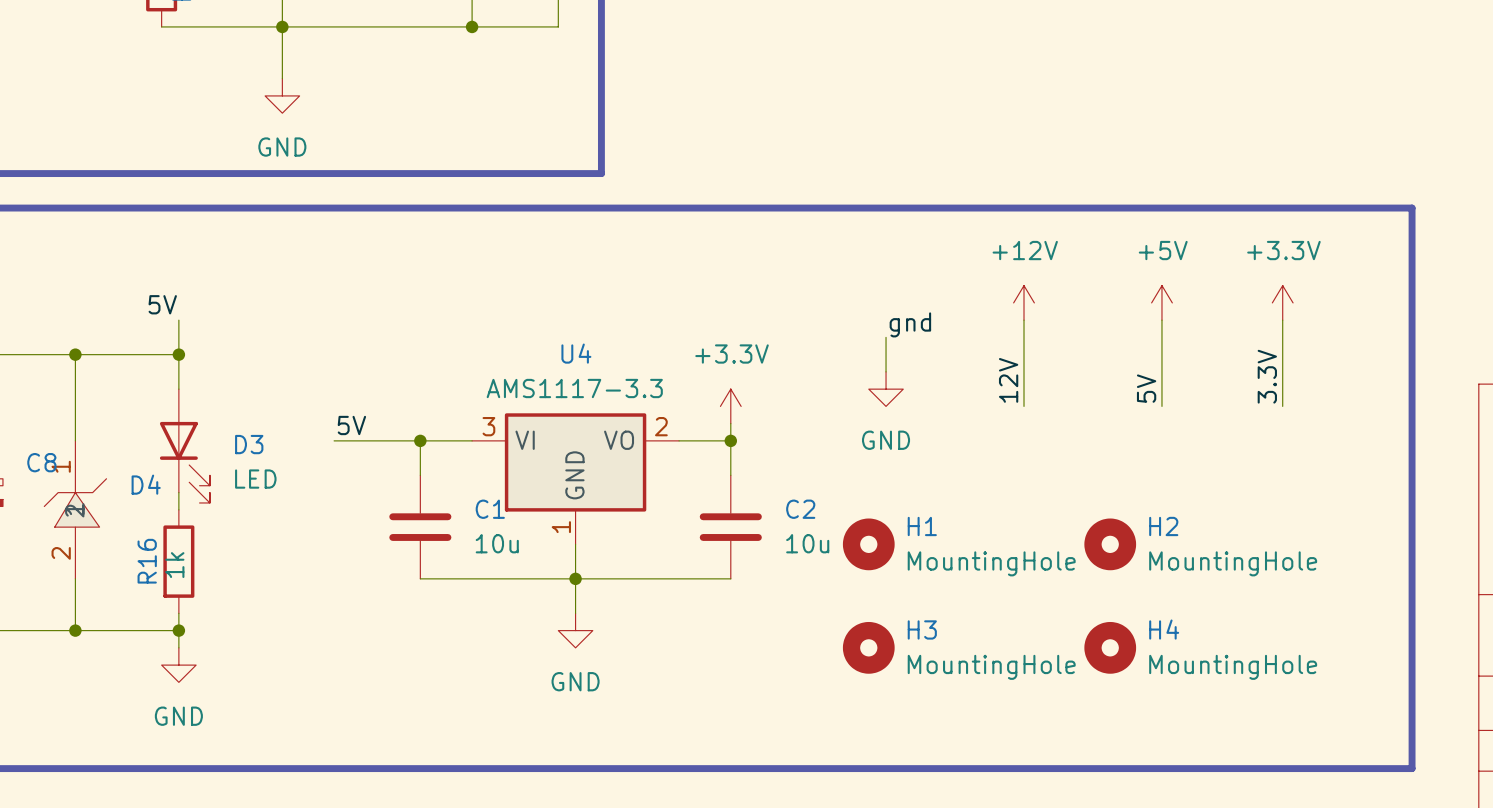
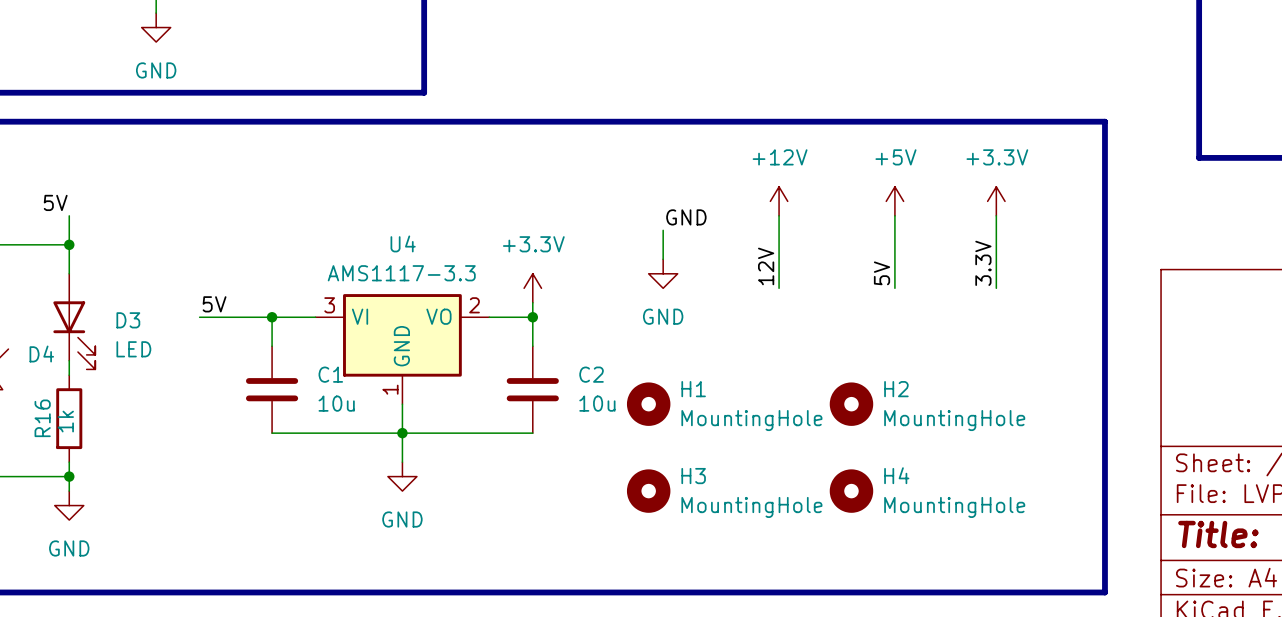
label: gnd (910, 324) -> GND (686, 217)

